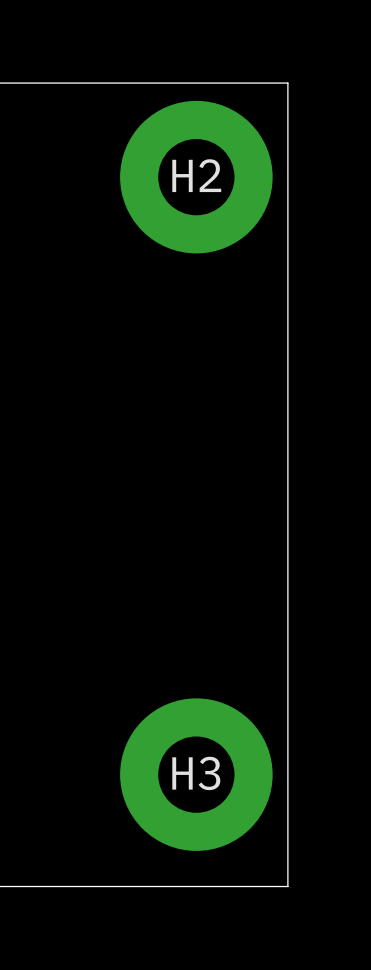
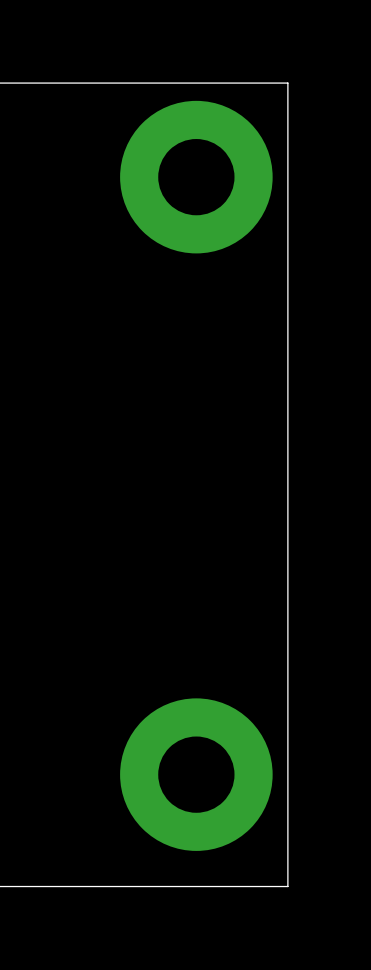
H2 name: H2 (196, 175) -> none
H3 name: H3 (196, 773) -> none

